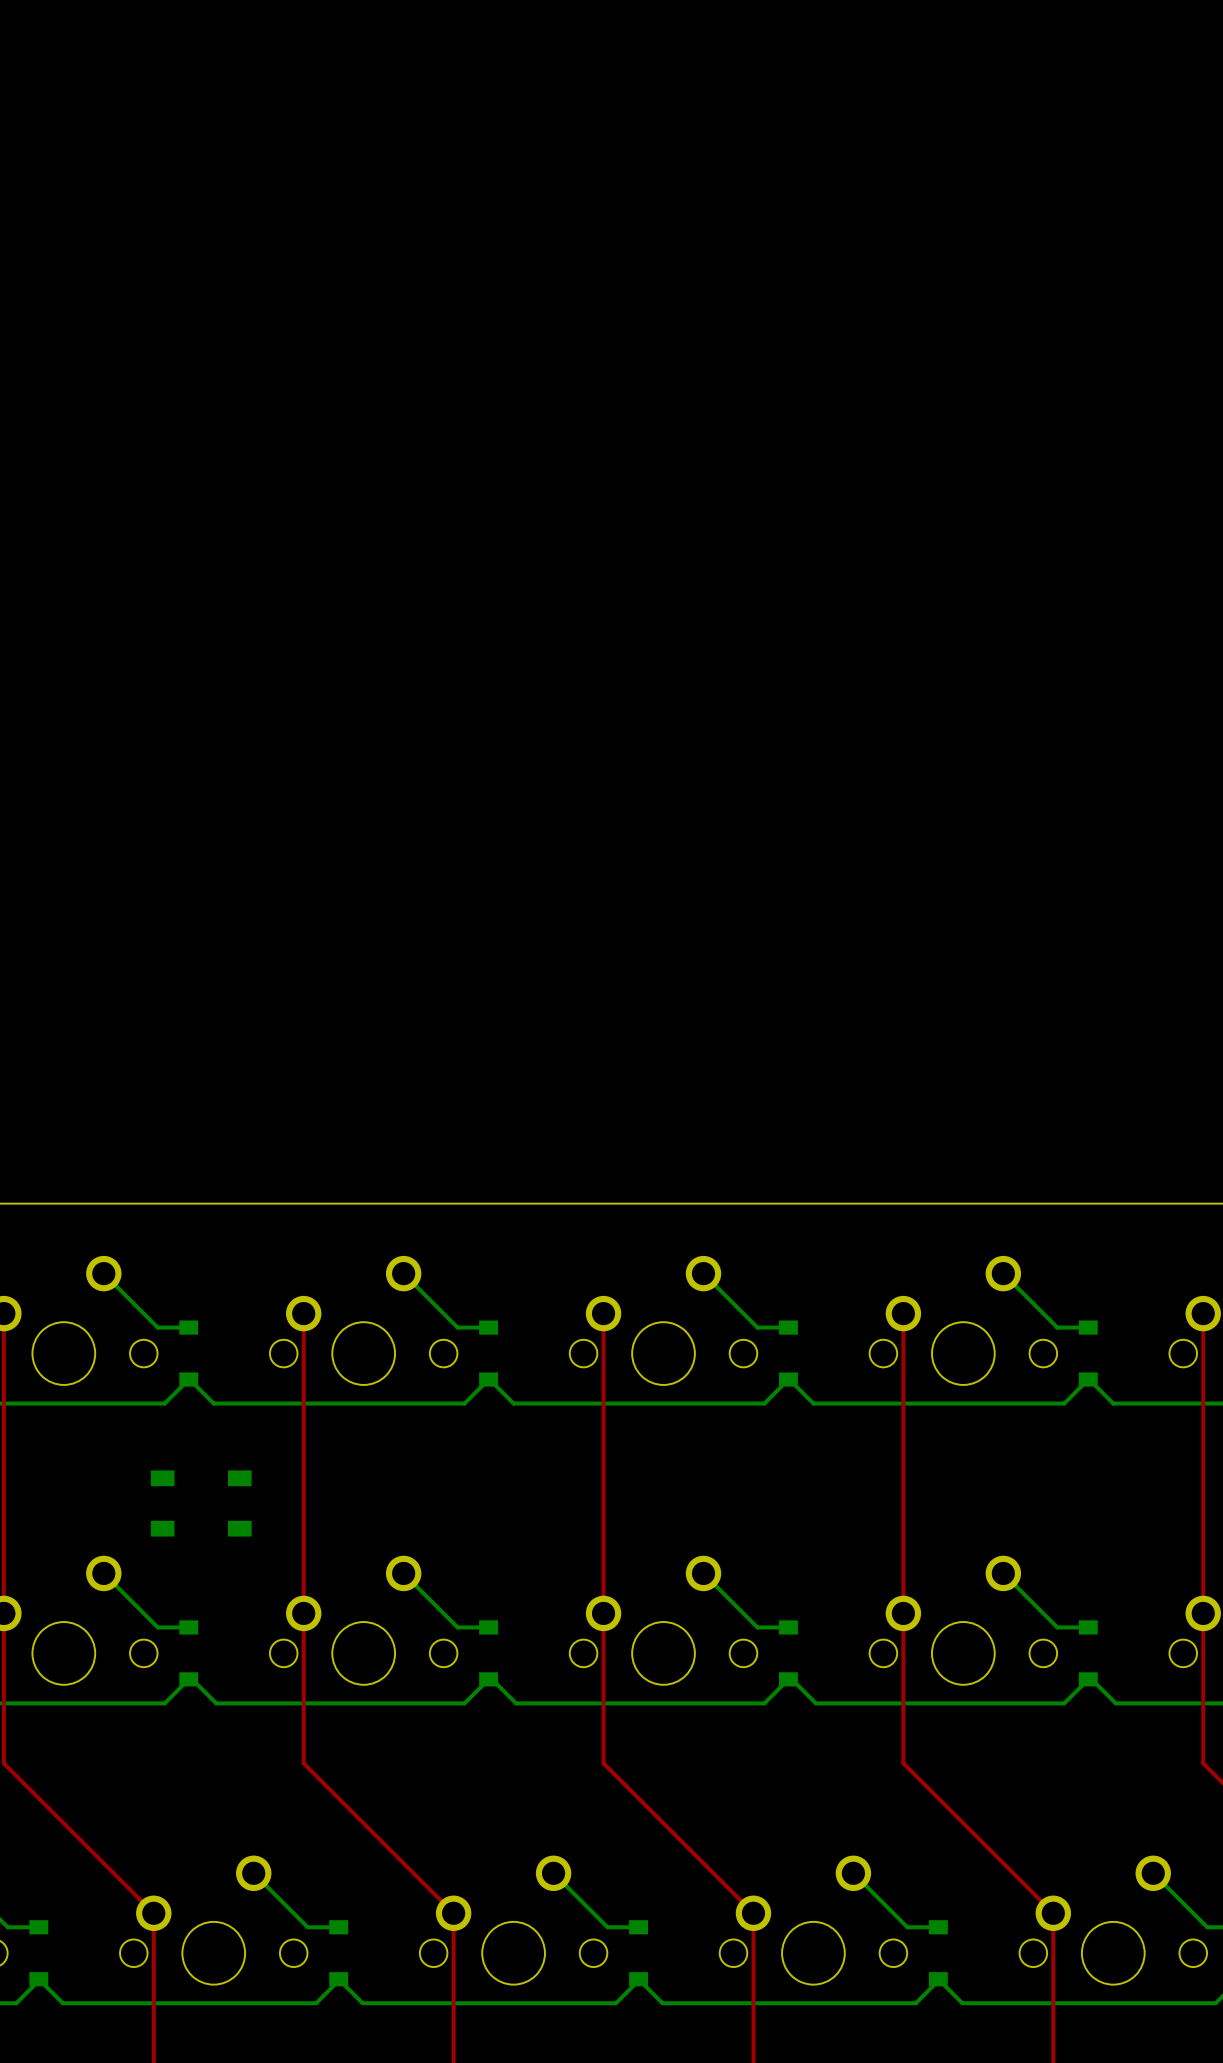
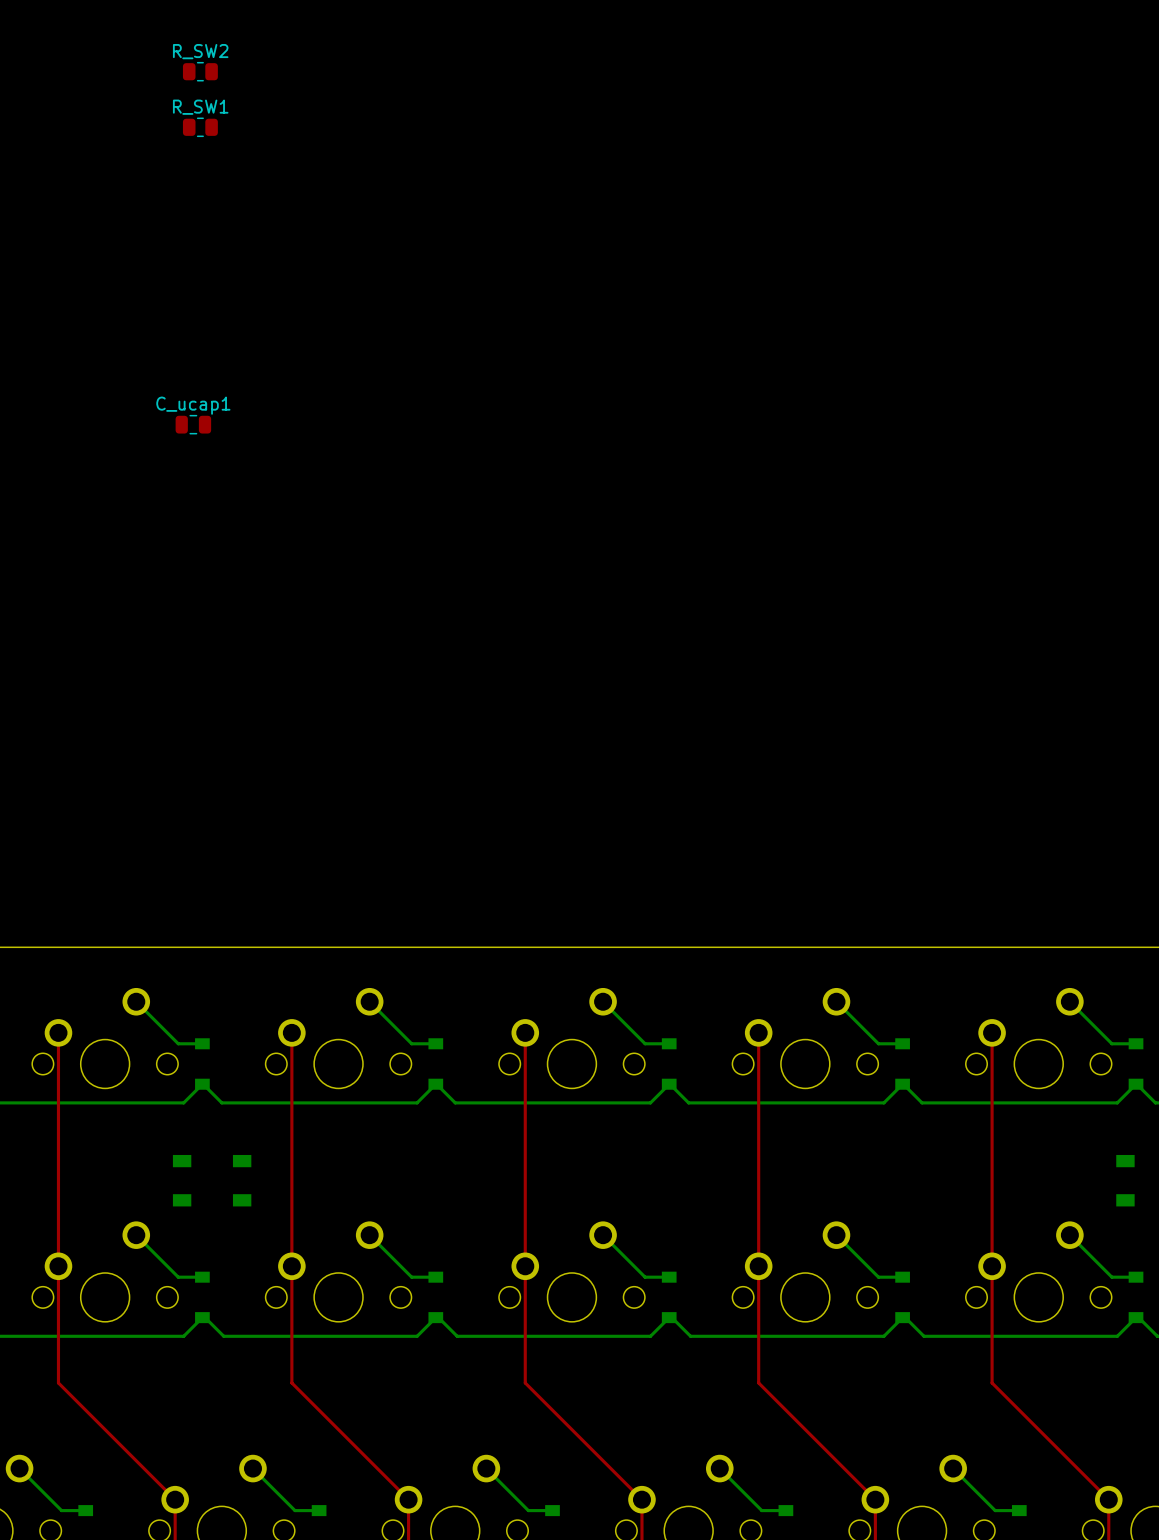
R_SW2: none -> (200, 71)
R_SW1: none -> (200, 127)
C_ucap1: none -> (193, 424)

